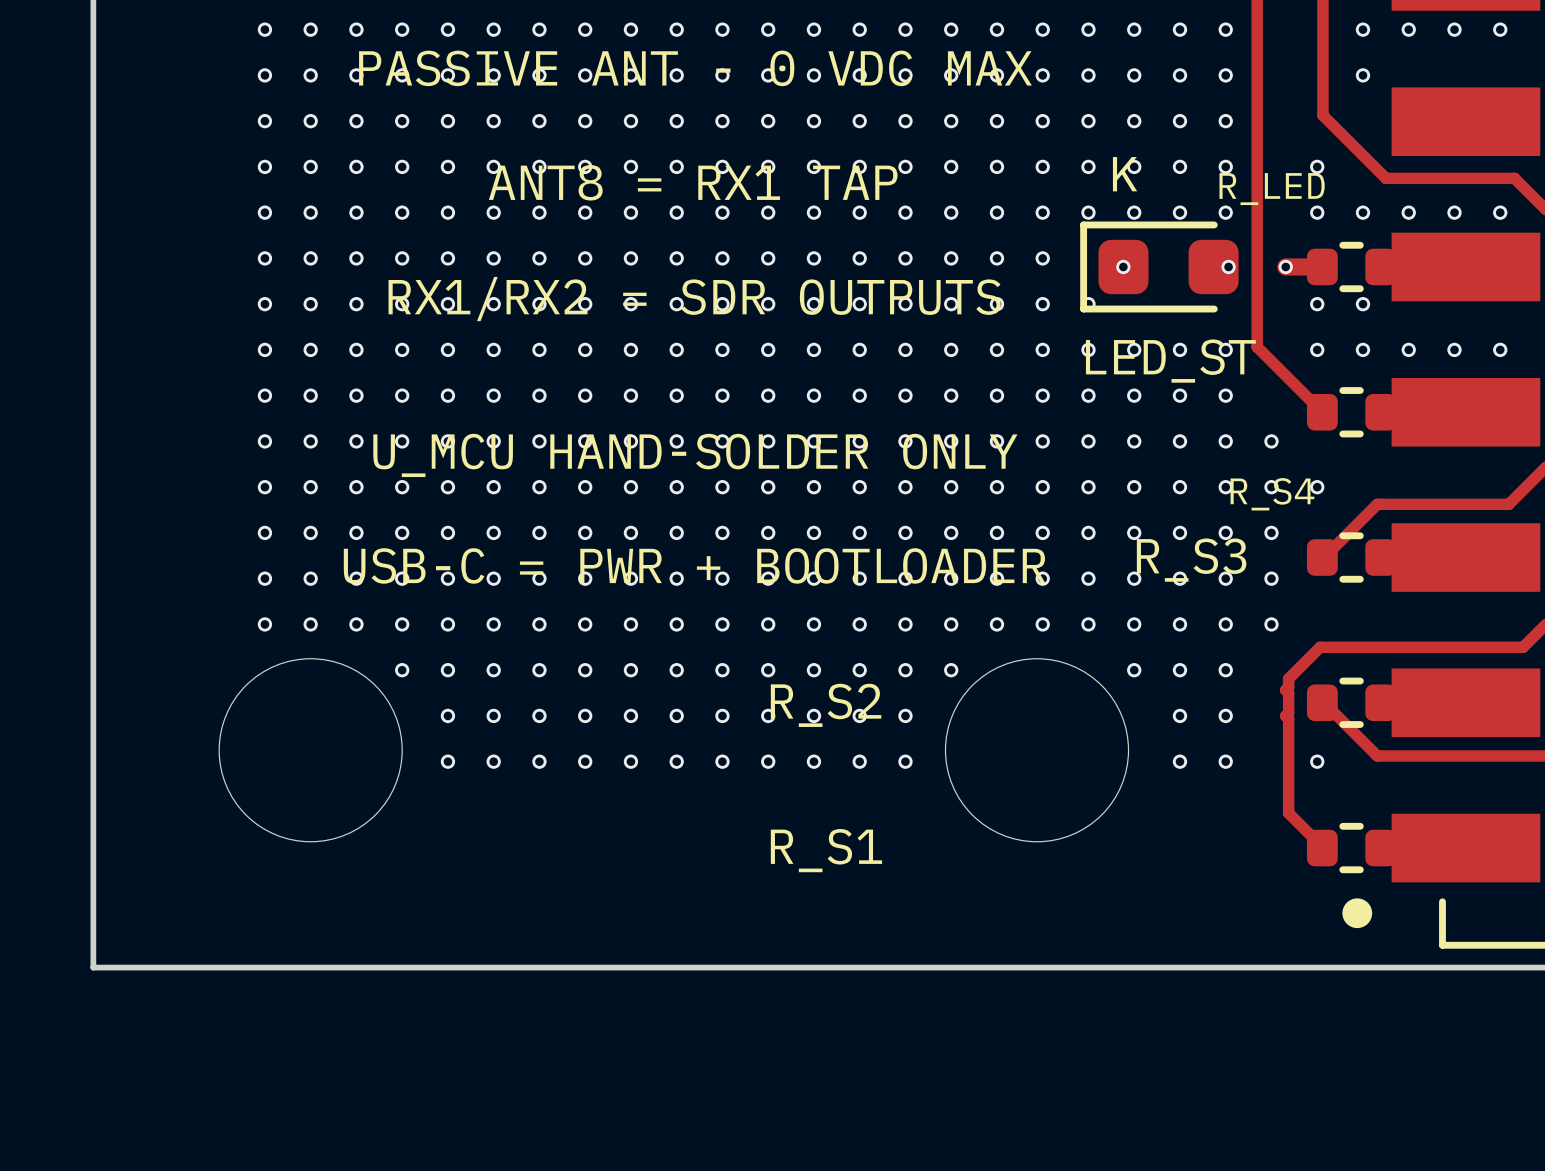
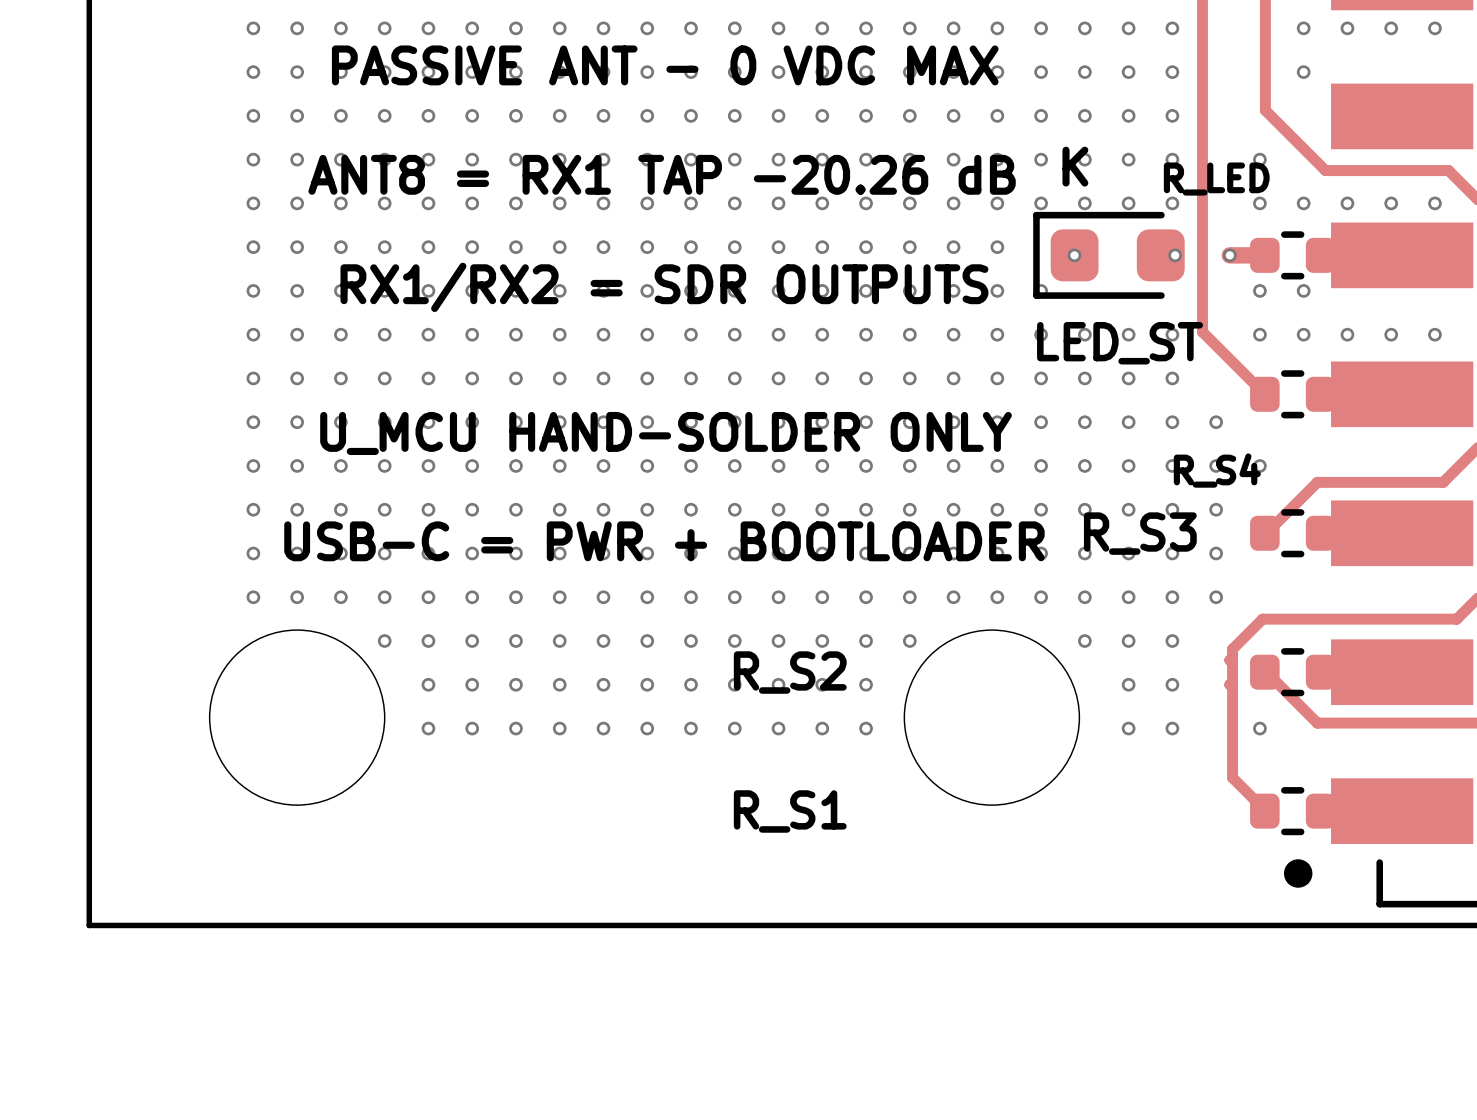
text: ANT8 = RX1 TAP (693, 182) -> ANT8 = RX1 TAP -20.26 dB (662, 174)

